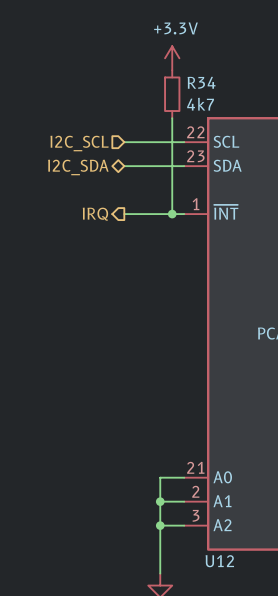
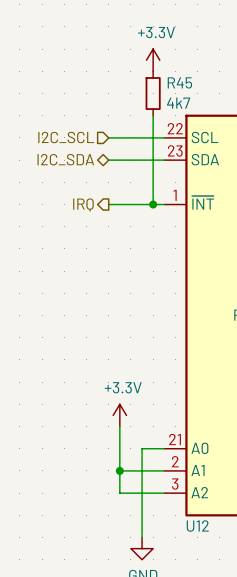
R34 name: R34 (201, 82) -> R45 (179, 82)
power symbol: none -> +3.3V (119, 415)
wire: none -> (119, 426) (119, 493) (142, 493)
wire: none -> (119, 470) (142, 470)
junction: none -> (119, 470)
junction: (160, 501) -> none
junction: (160, 525) -> none

